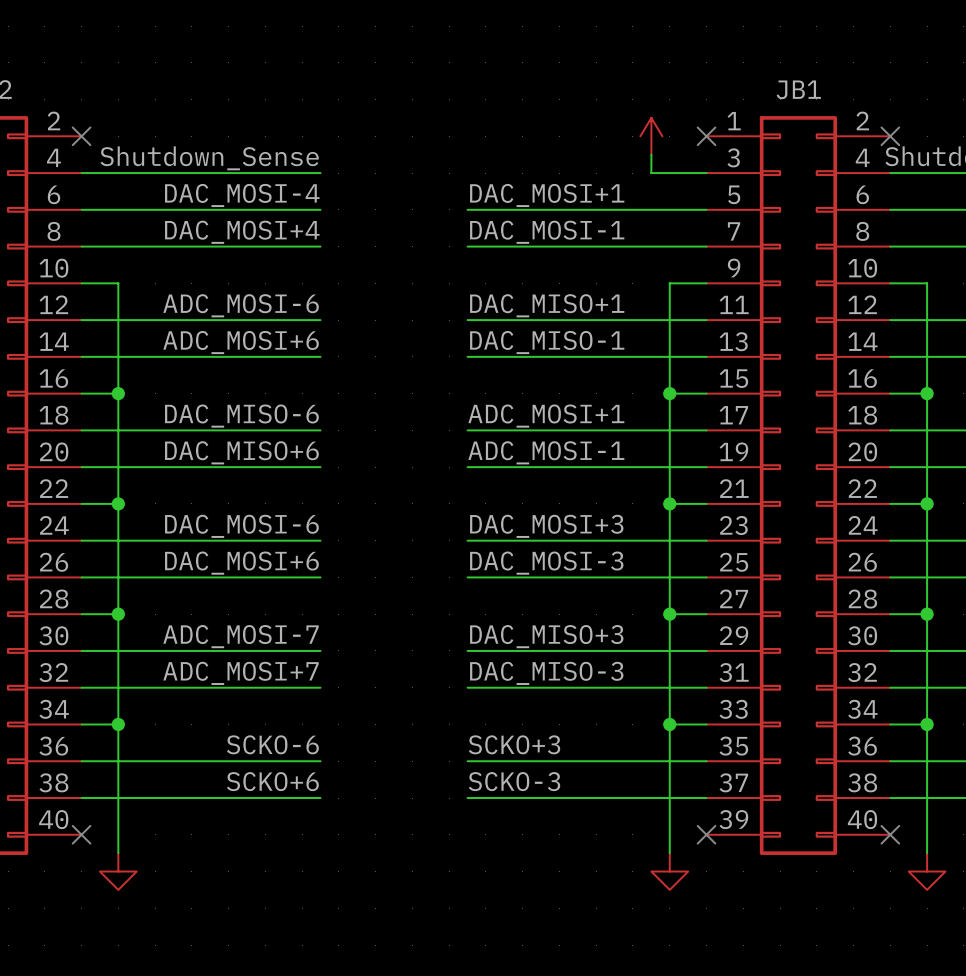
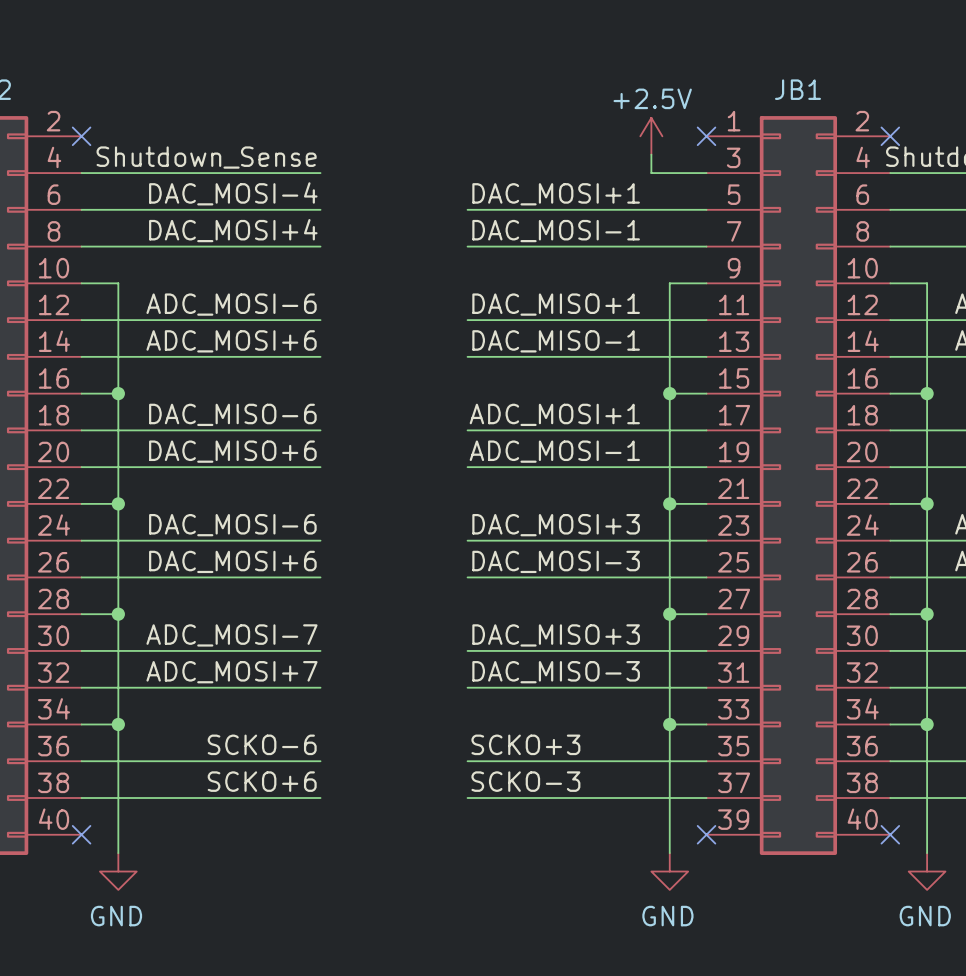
power symbol text: none -> +2.5V (652, 98)
power symbol text: none -> GND (116, 916)
power symbol text: none -> GND (667, 916)
power symbol text: none -> GND (925, 916)

